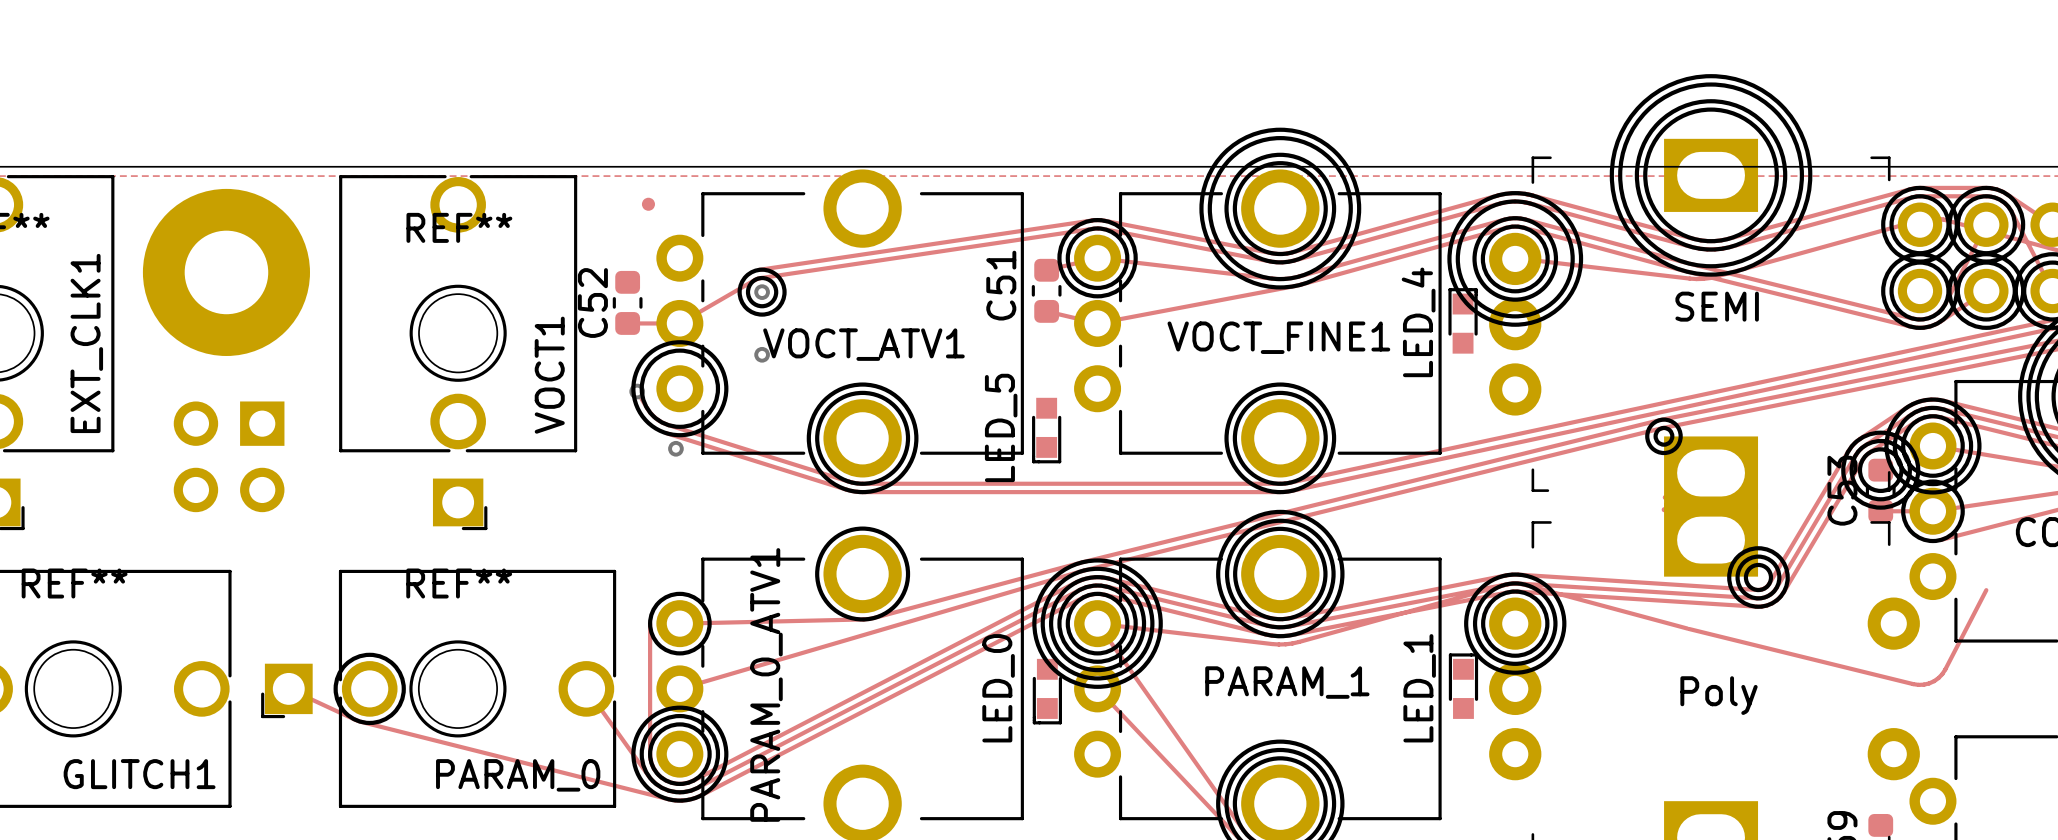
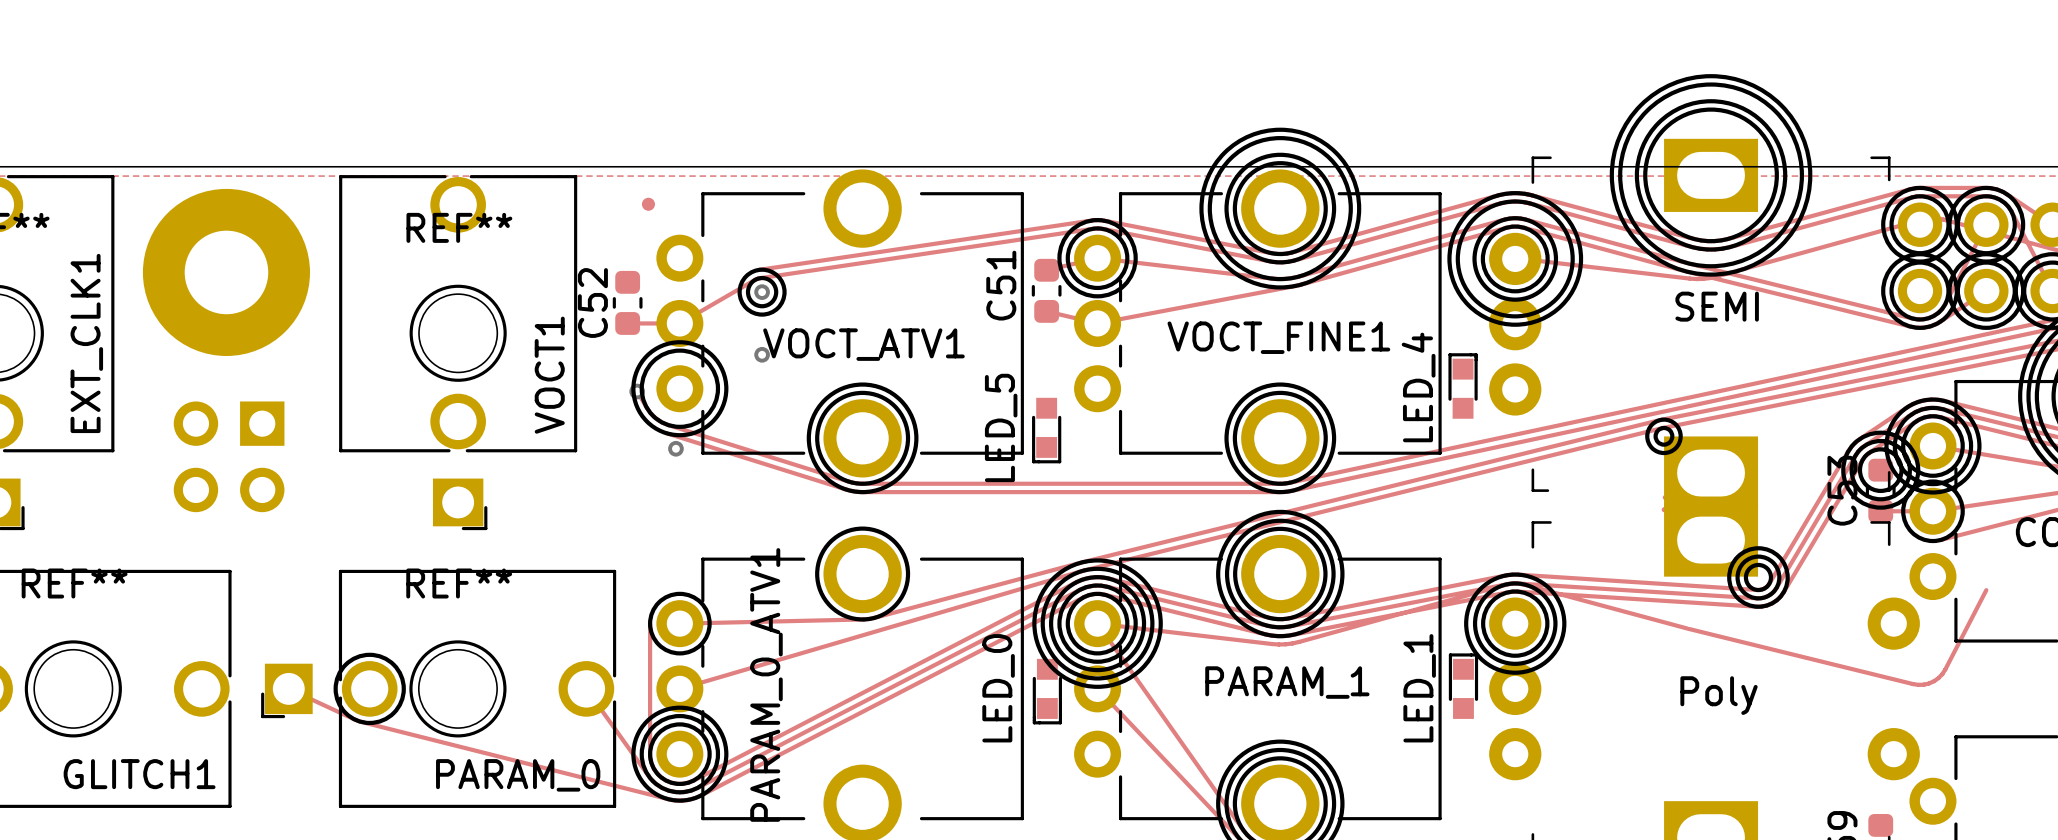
LED_4 position: (1463, 320) -> (1463, 385)

